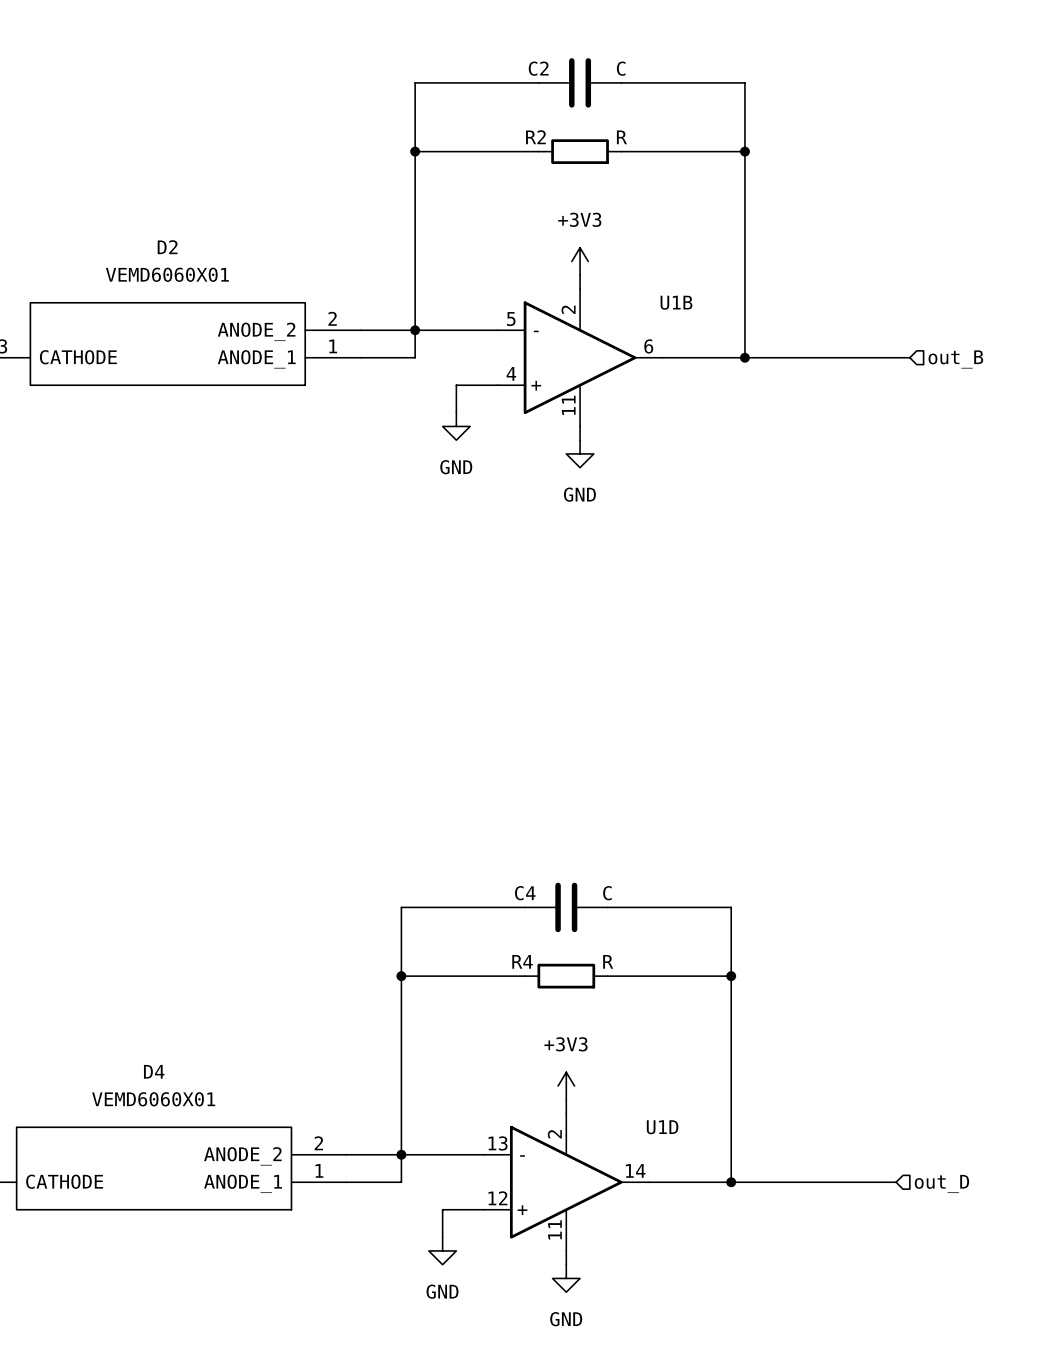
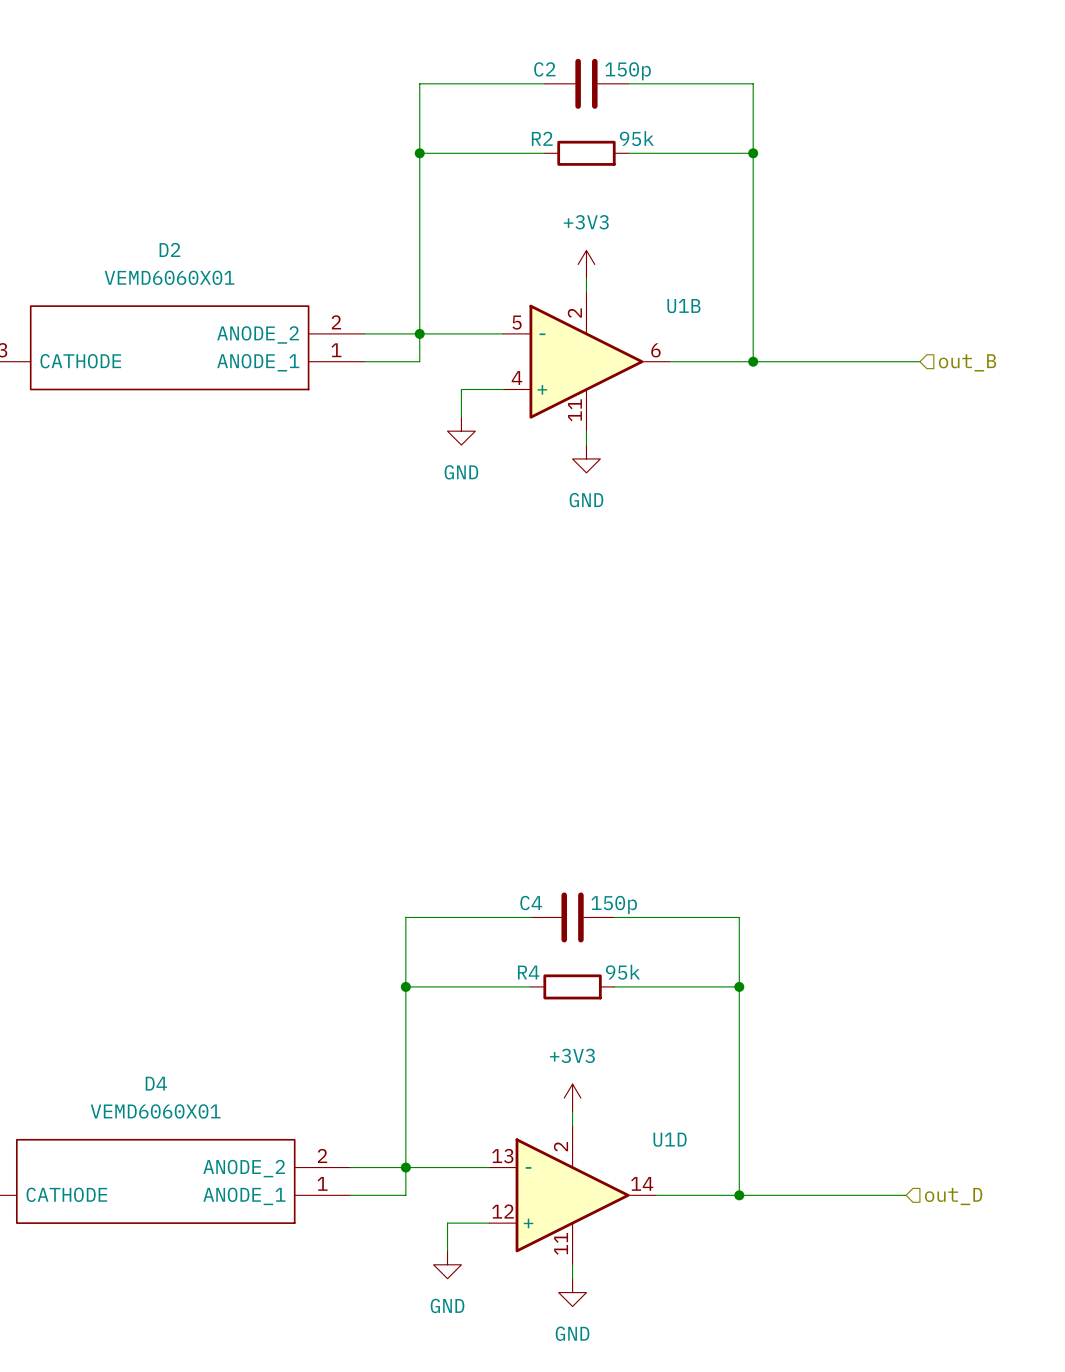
C2 value: C (621, 68) -> 150p (628, 71)
R2 value: R (621, 137) -> 95k (636, 138)
C4 value: C (607, 893) -> 150p (614, 904)
R4 value: R (608, 961) -> 95k (622, 972)

